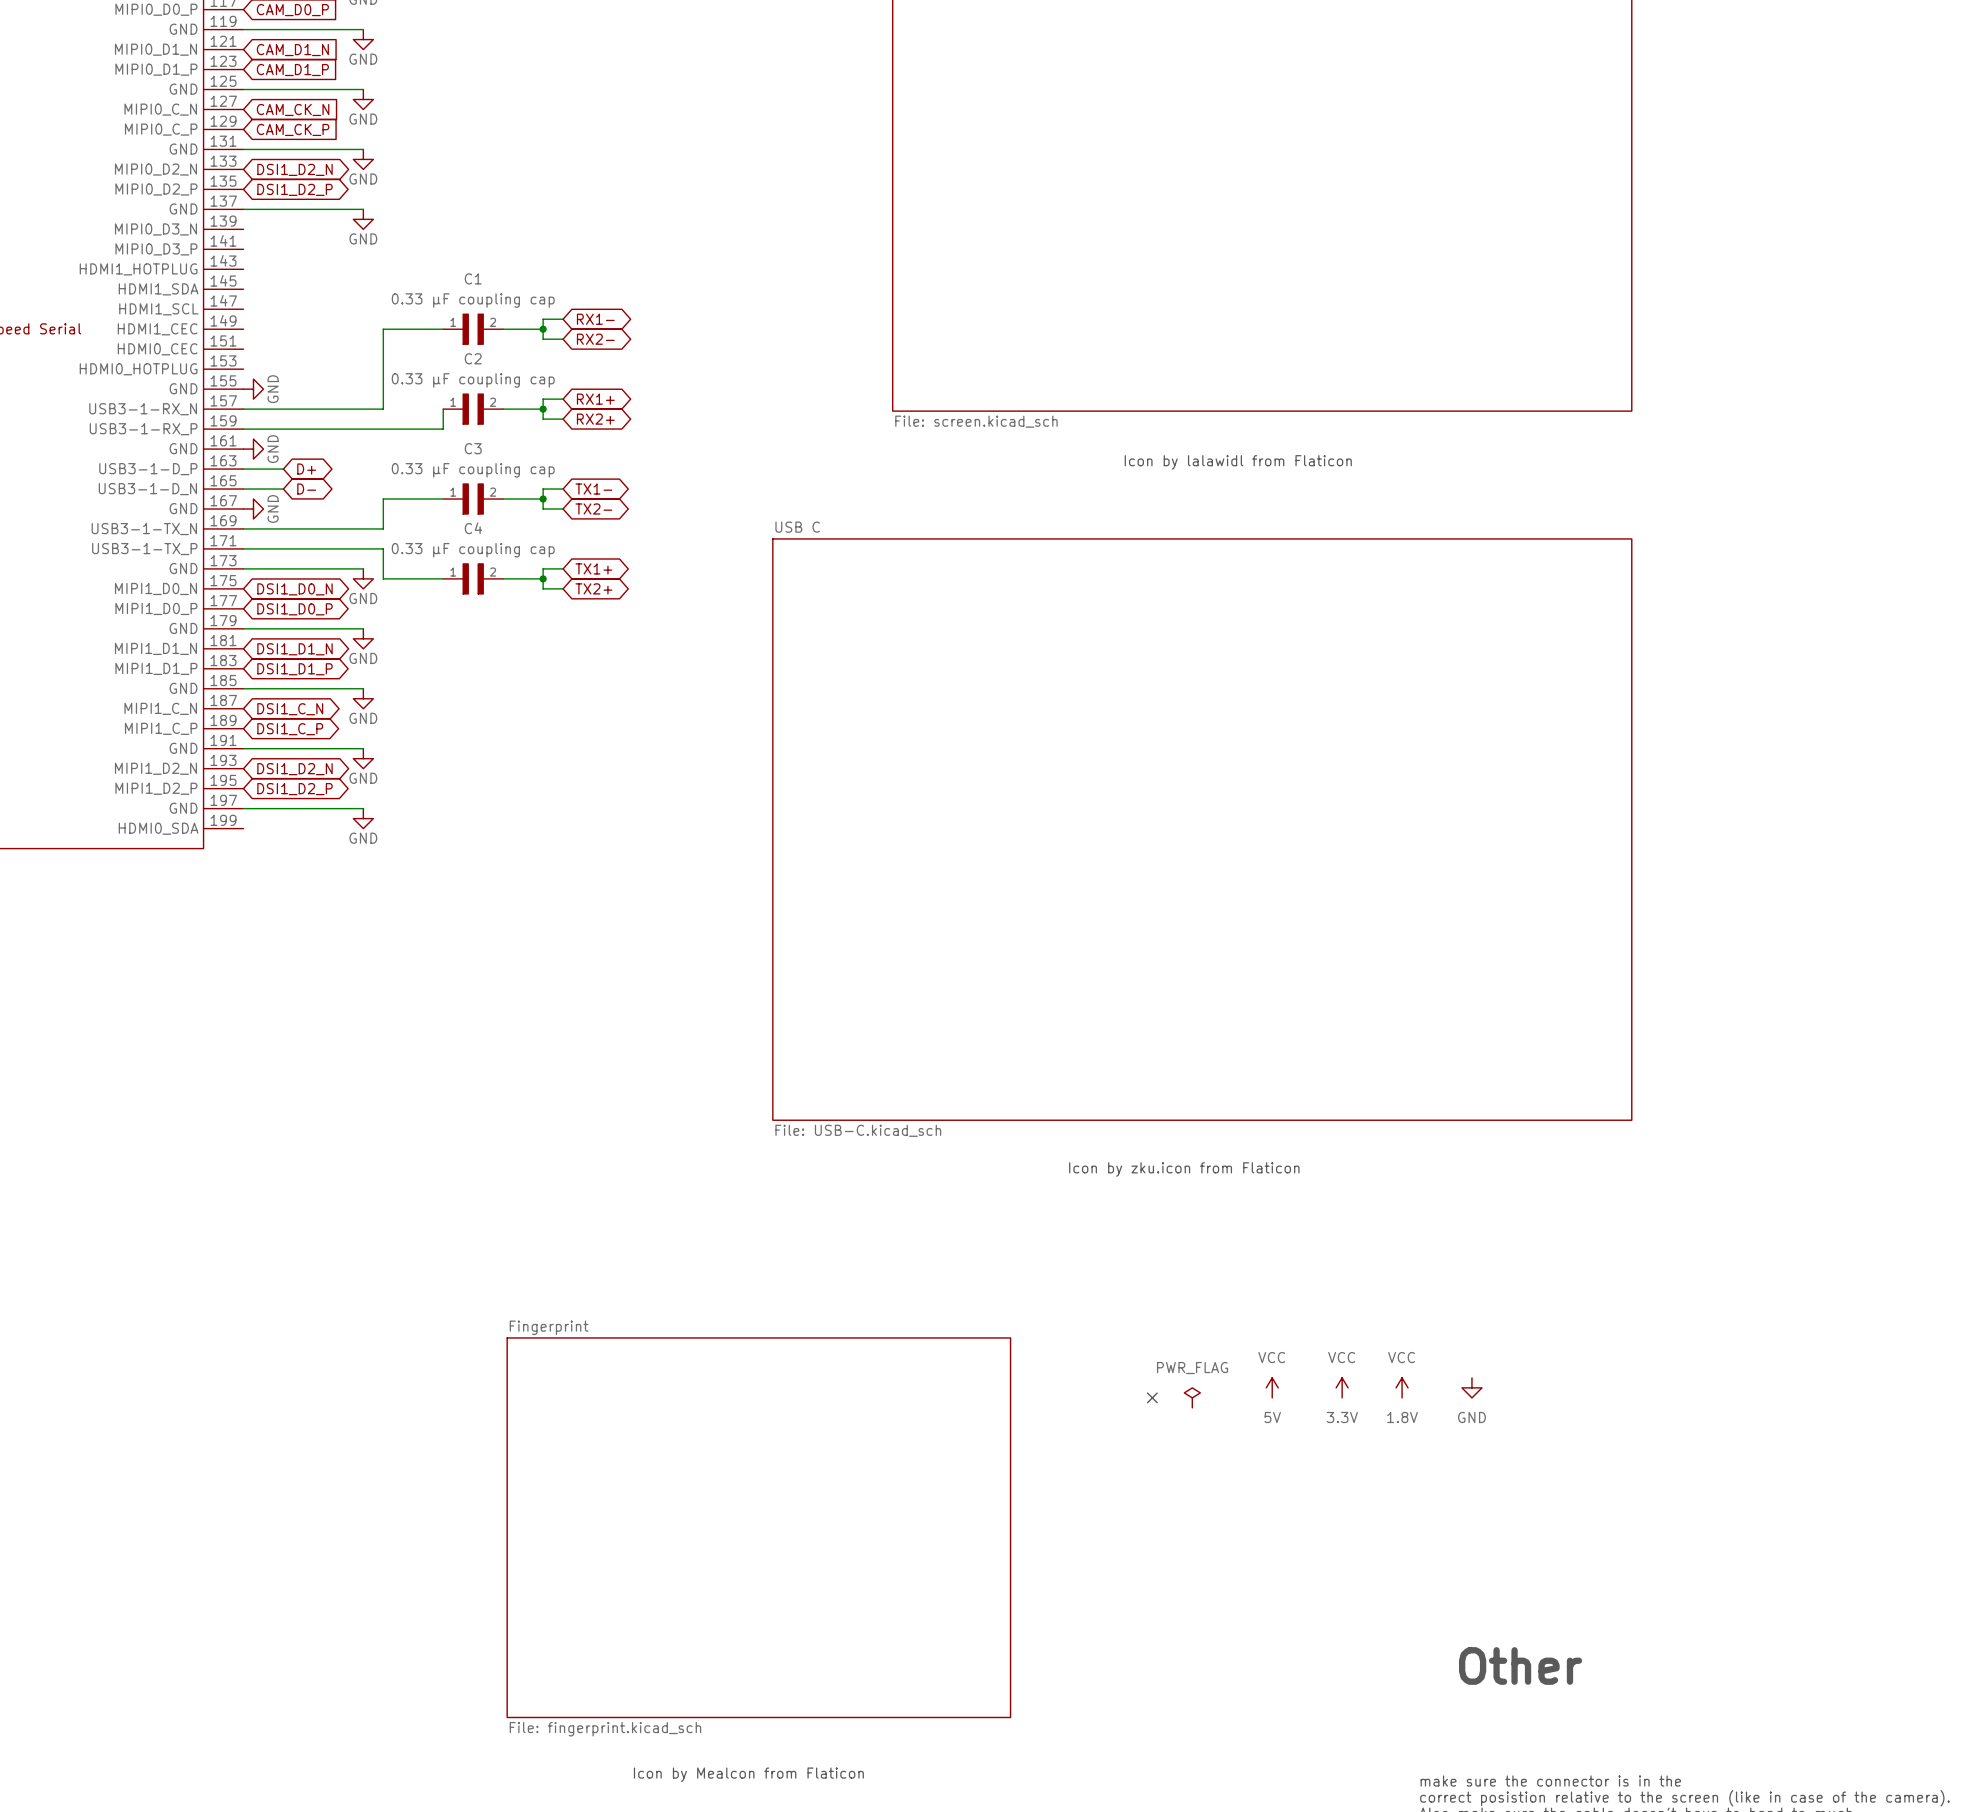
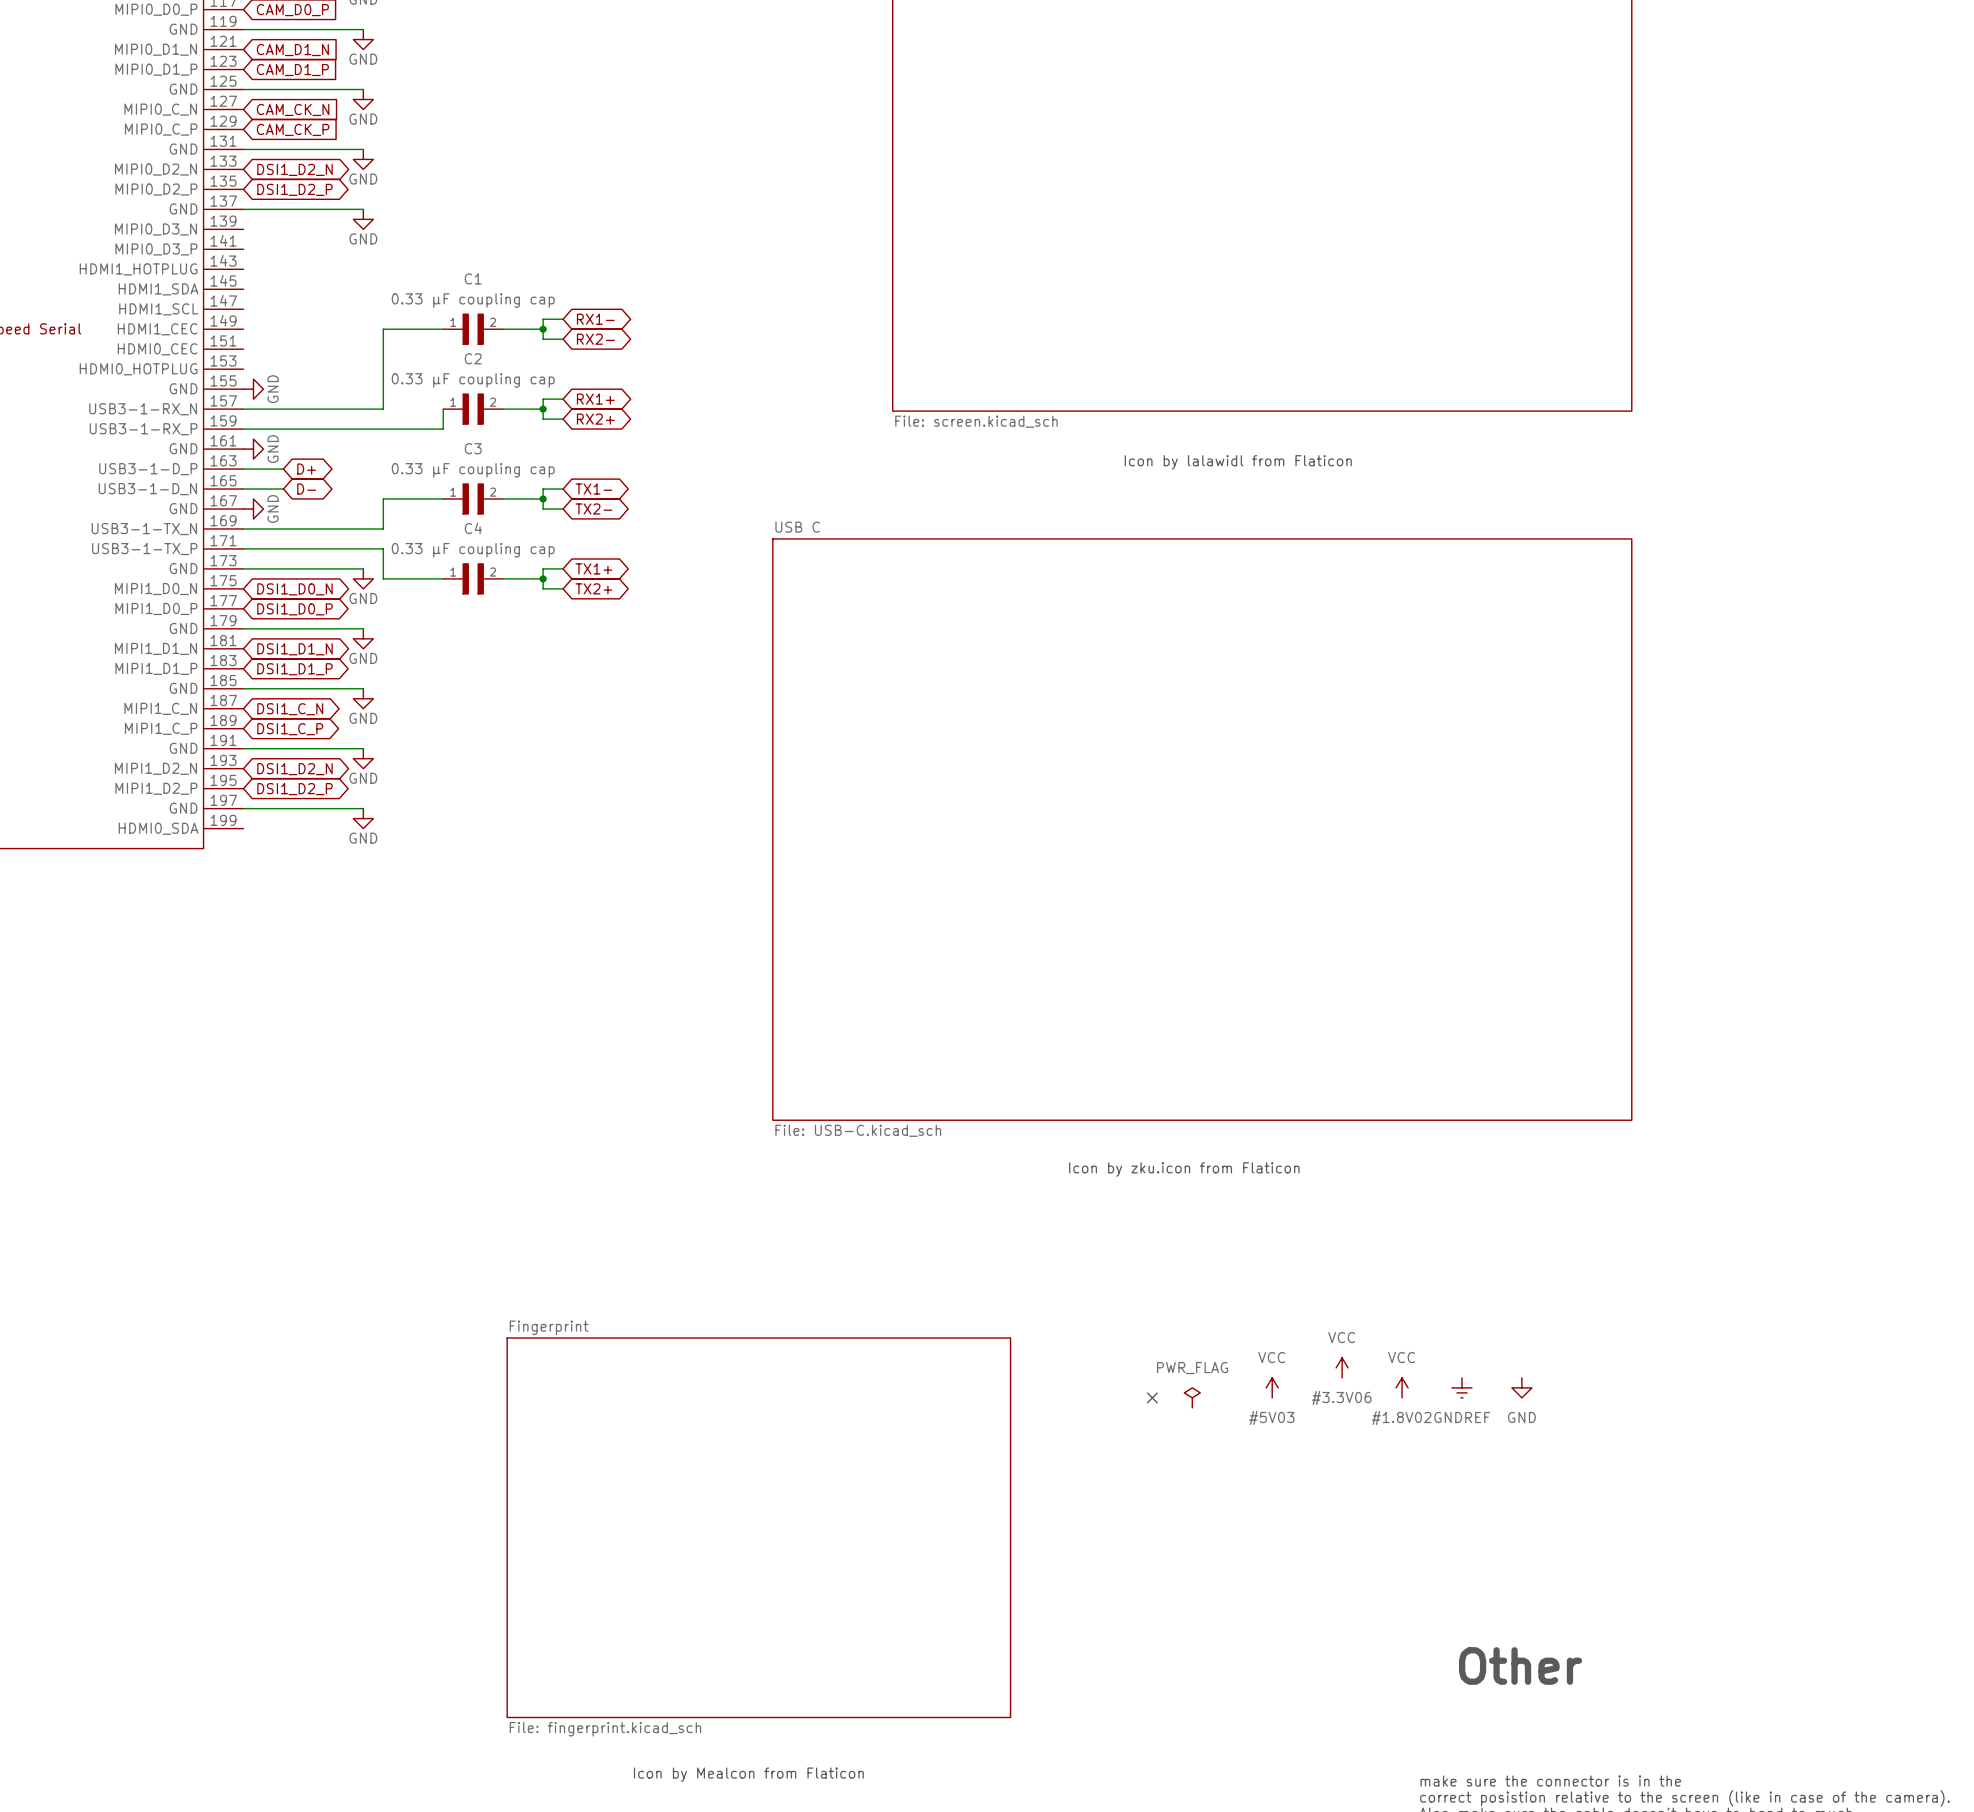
#3.3V06: none -> VCC (1342, 1367)
3.3V: VCC (1342, 1387) -> none
power symbol: none -> GNDREF (1461, 1387)
power symbol position: GND (1471, 1387) -> GND (1521, 1387)
5V name: 5V (1272, 1417) -> #5V03 (1271, 1417)
1.8V name: 1.8V (1402, 1417) -> #1.8V02 (1401, 1417)

